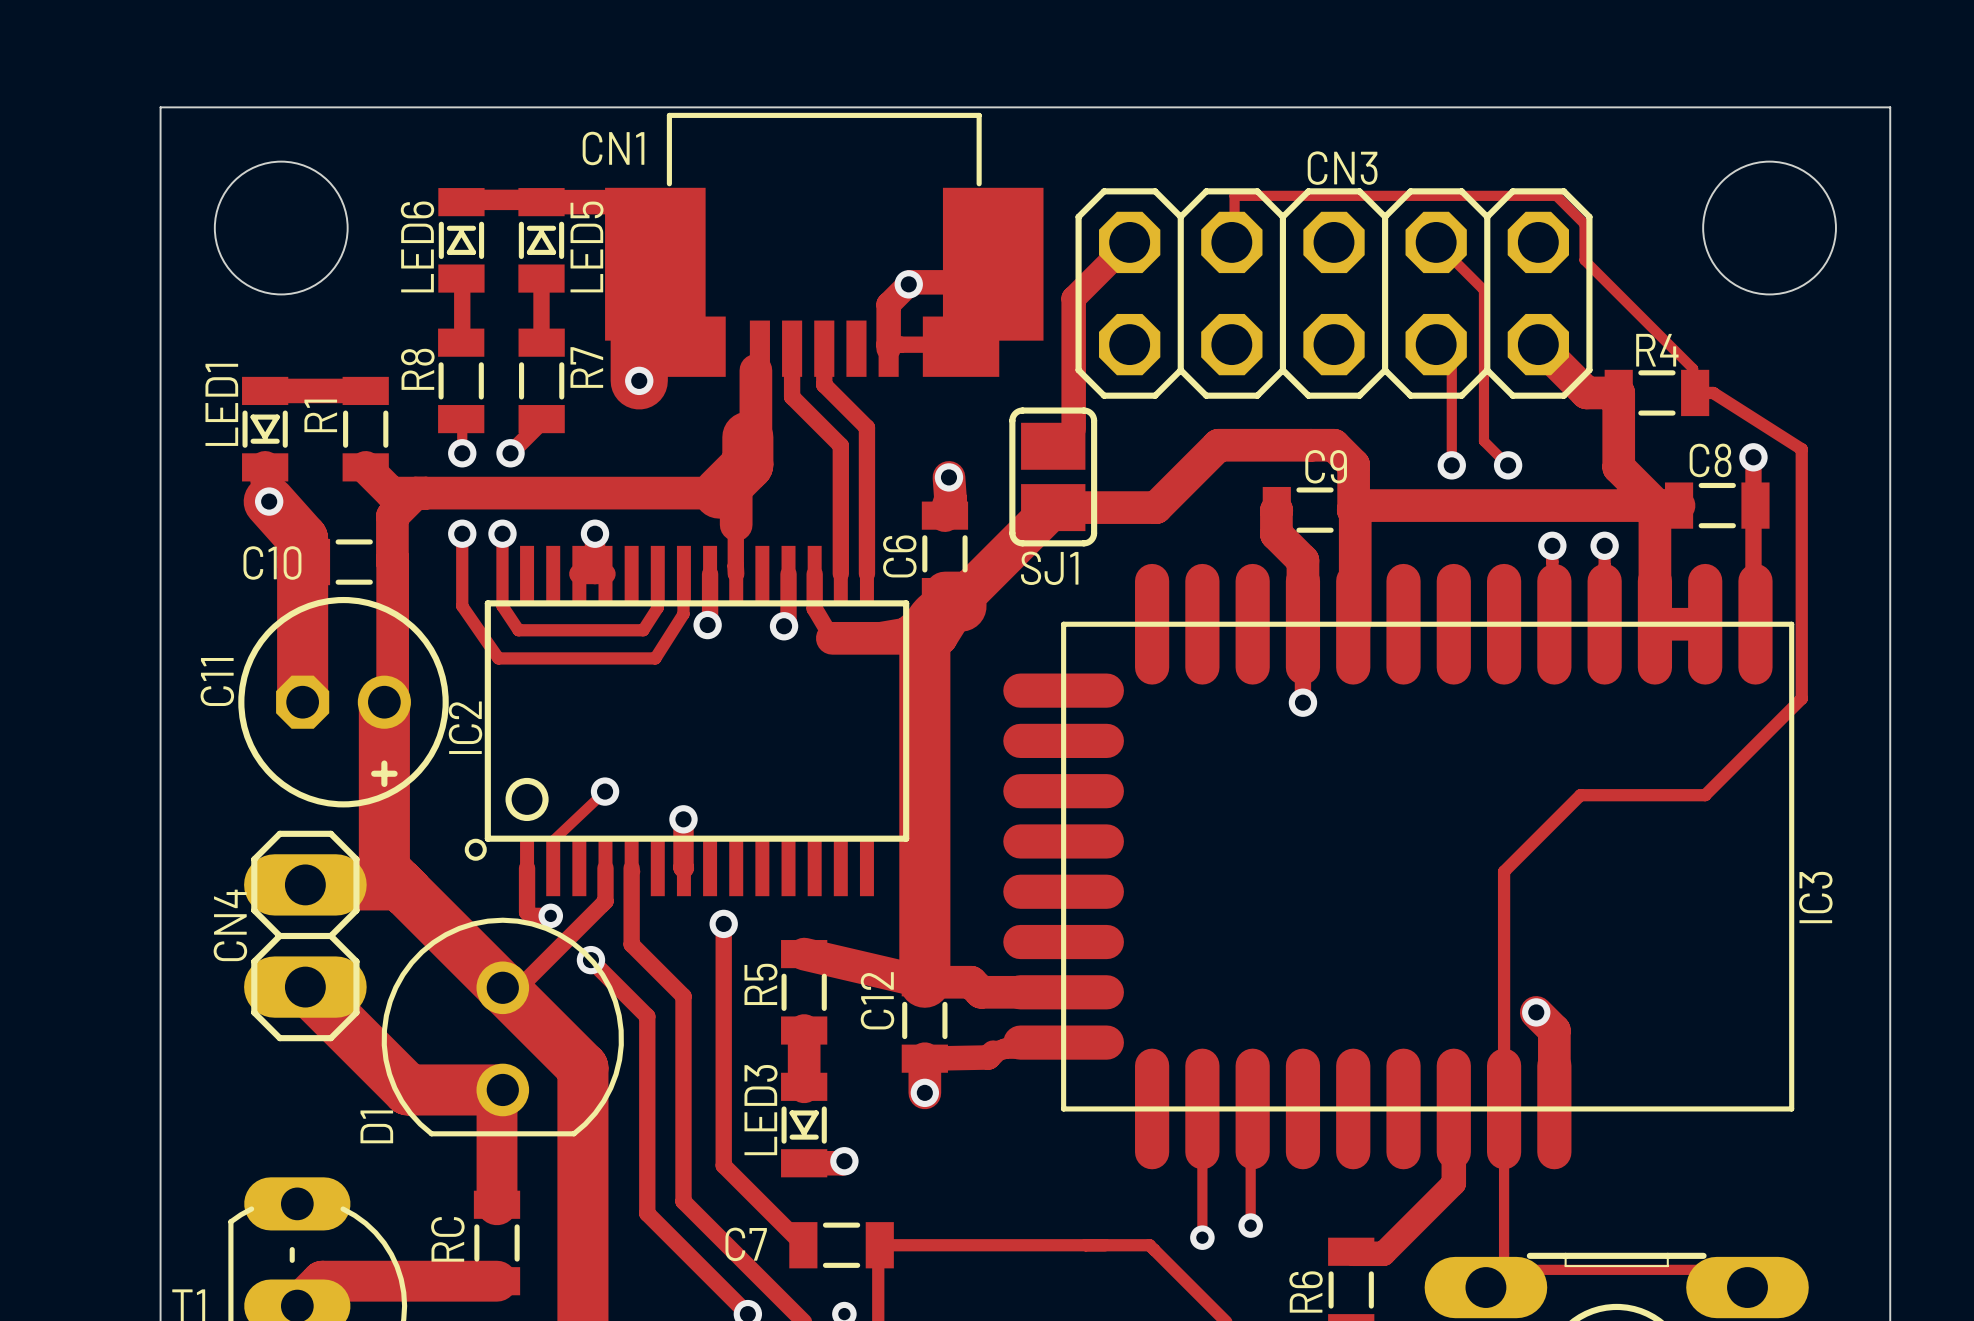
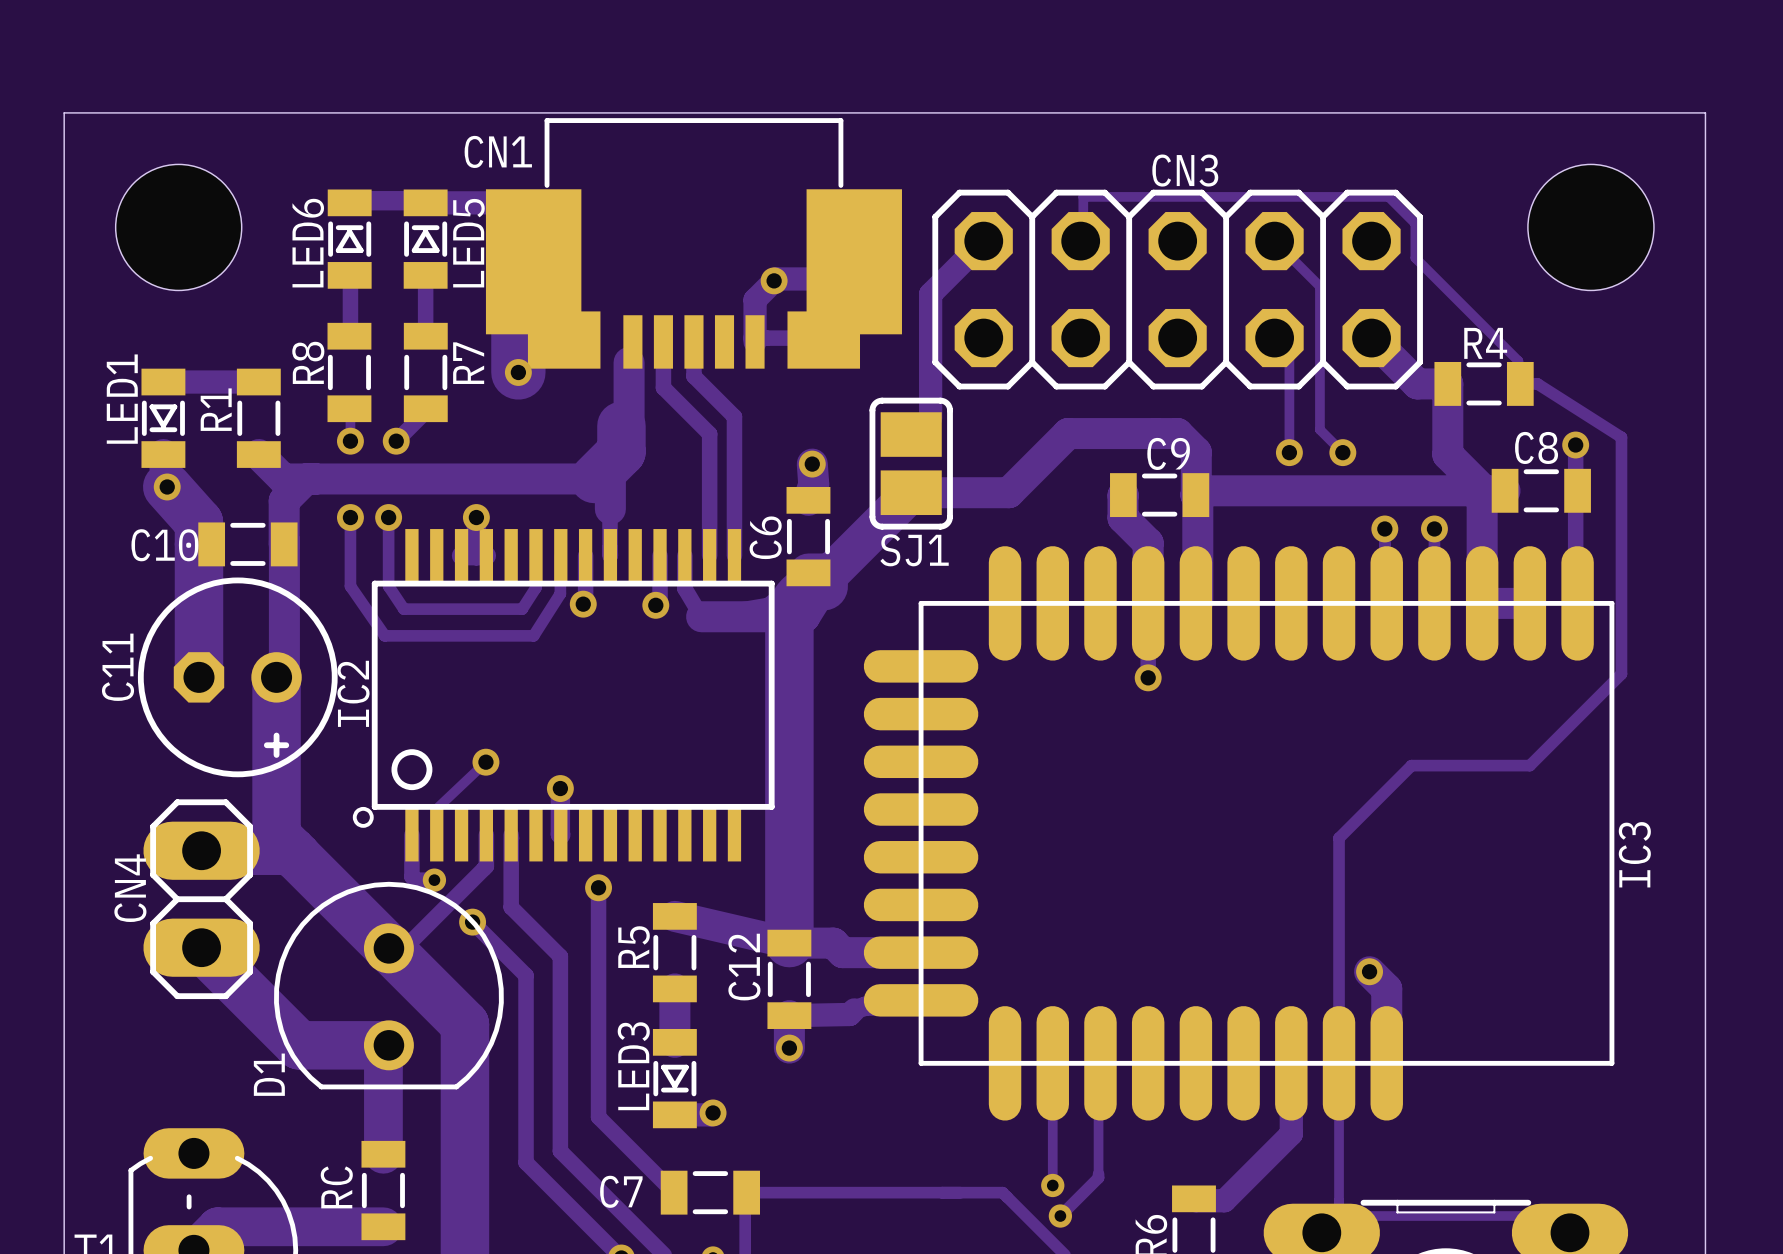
track: none -> (1098, 1174) (1098, 1177) (1060, 1216)
via position: (1250, 1225) -> (1060, 1216)

